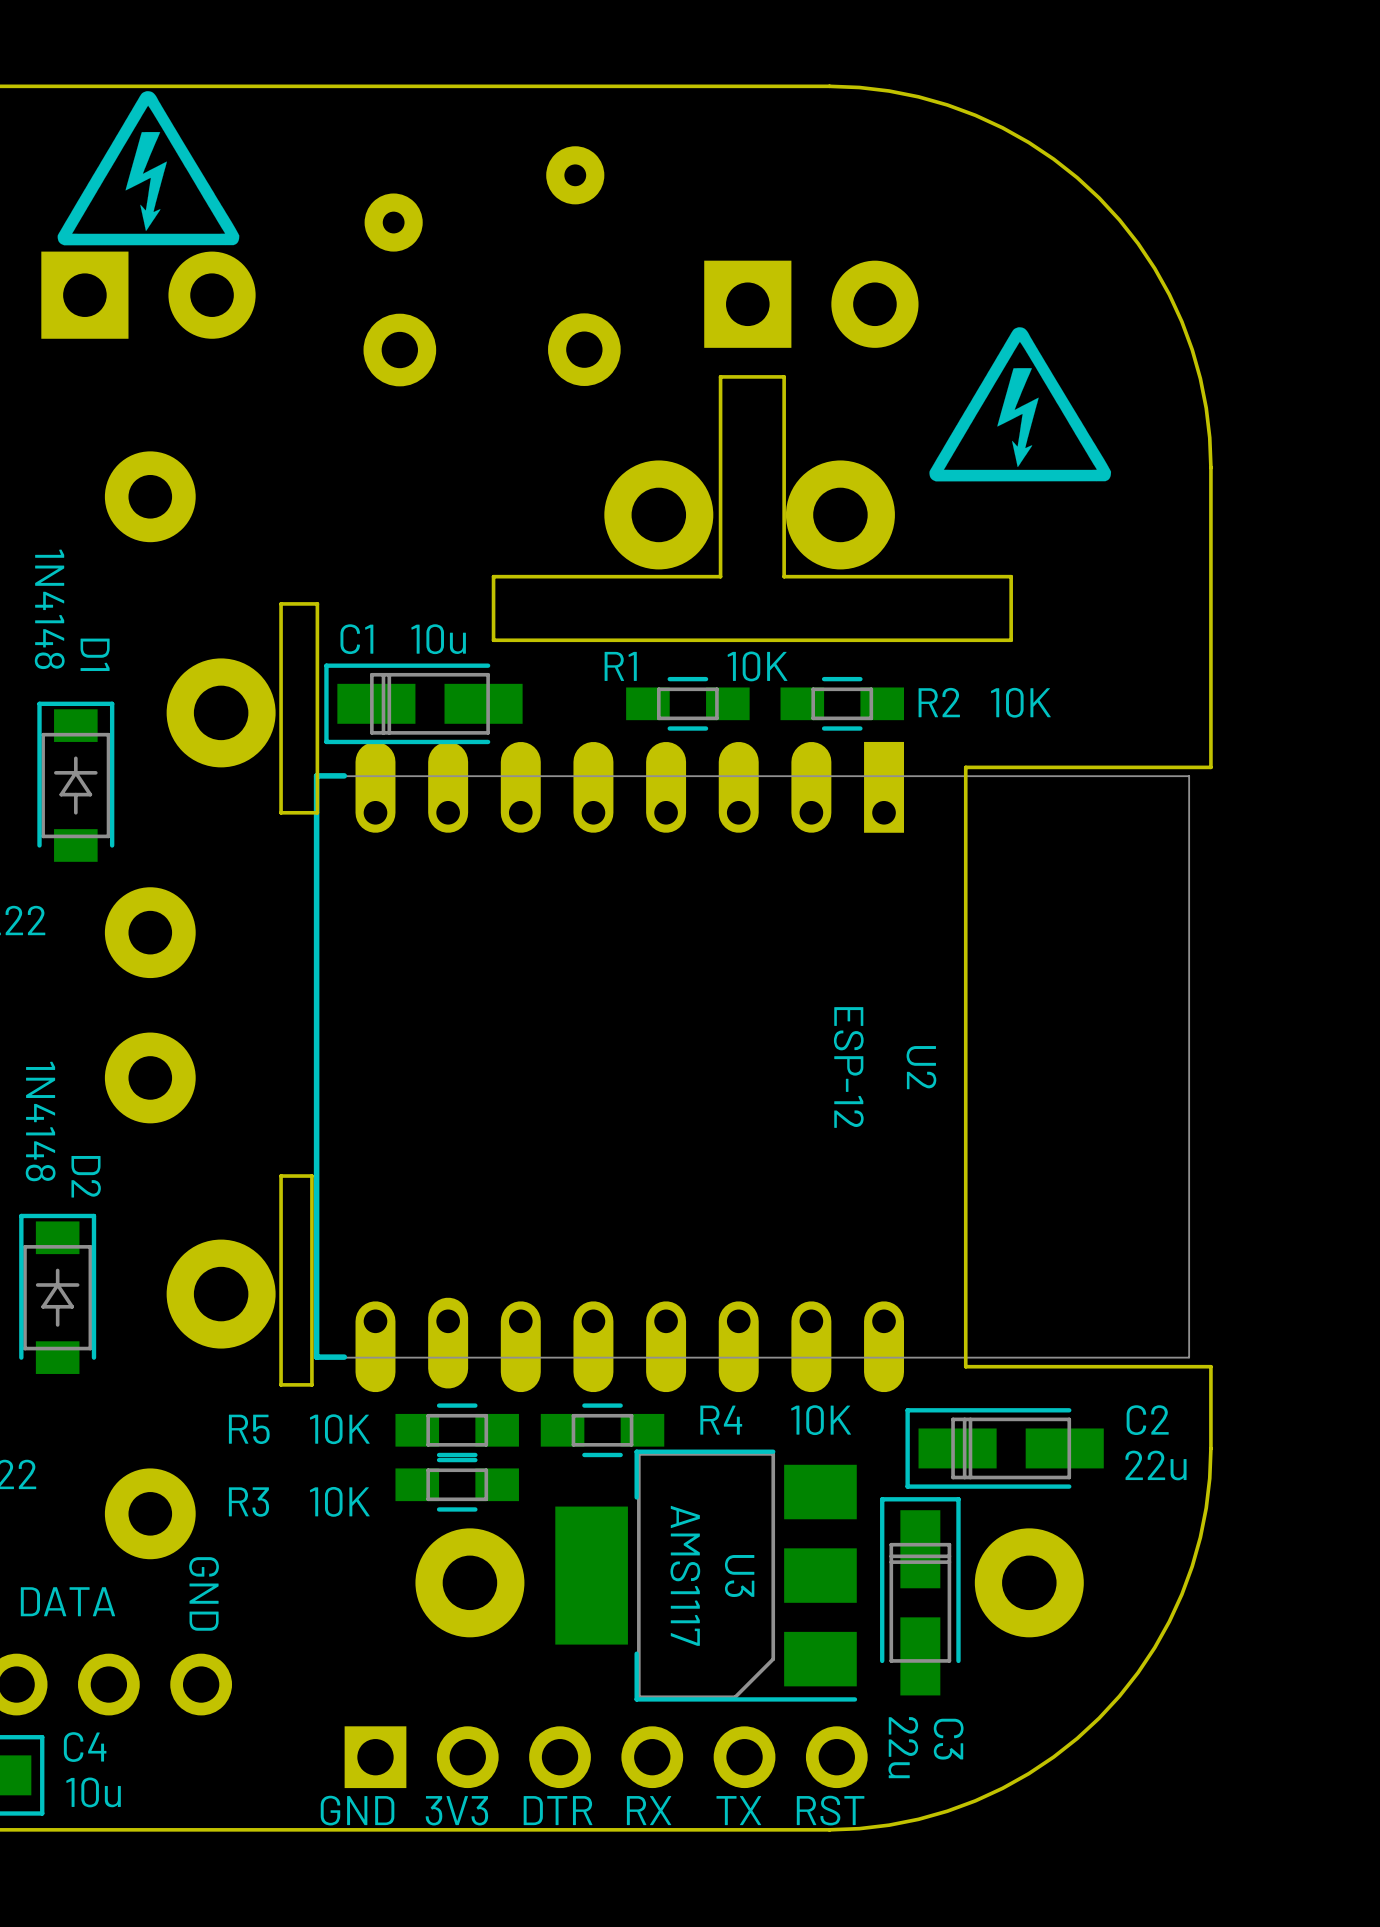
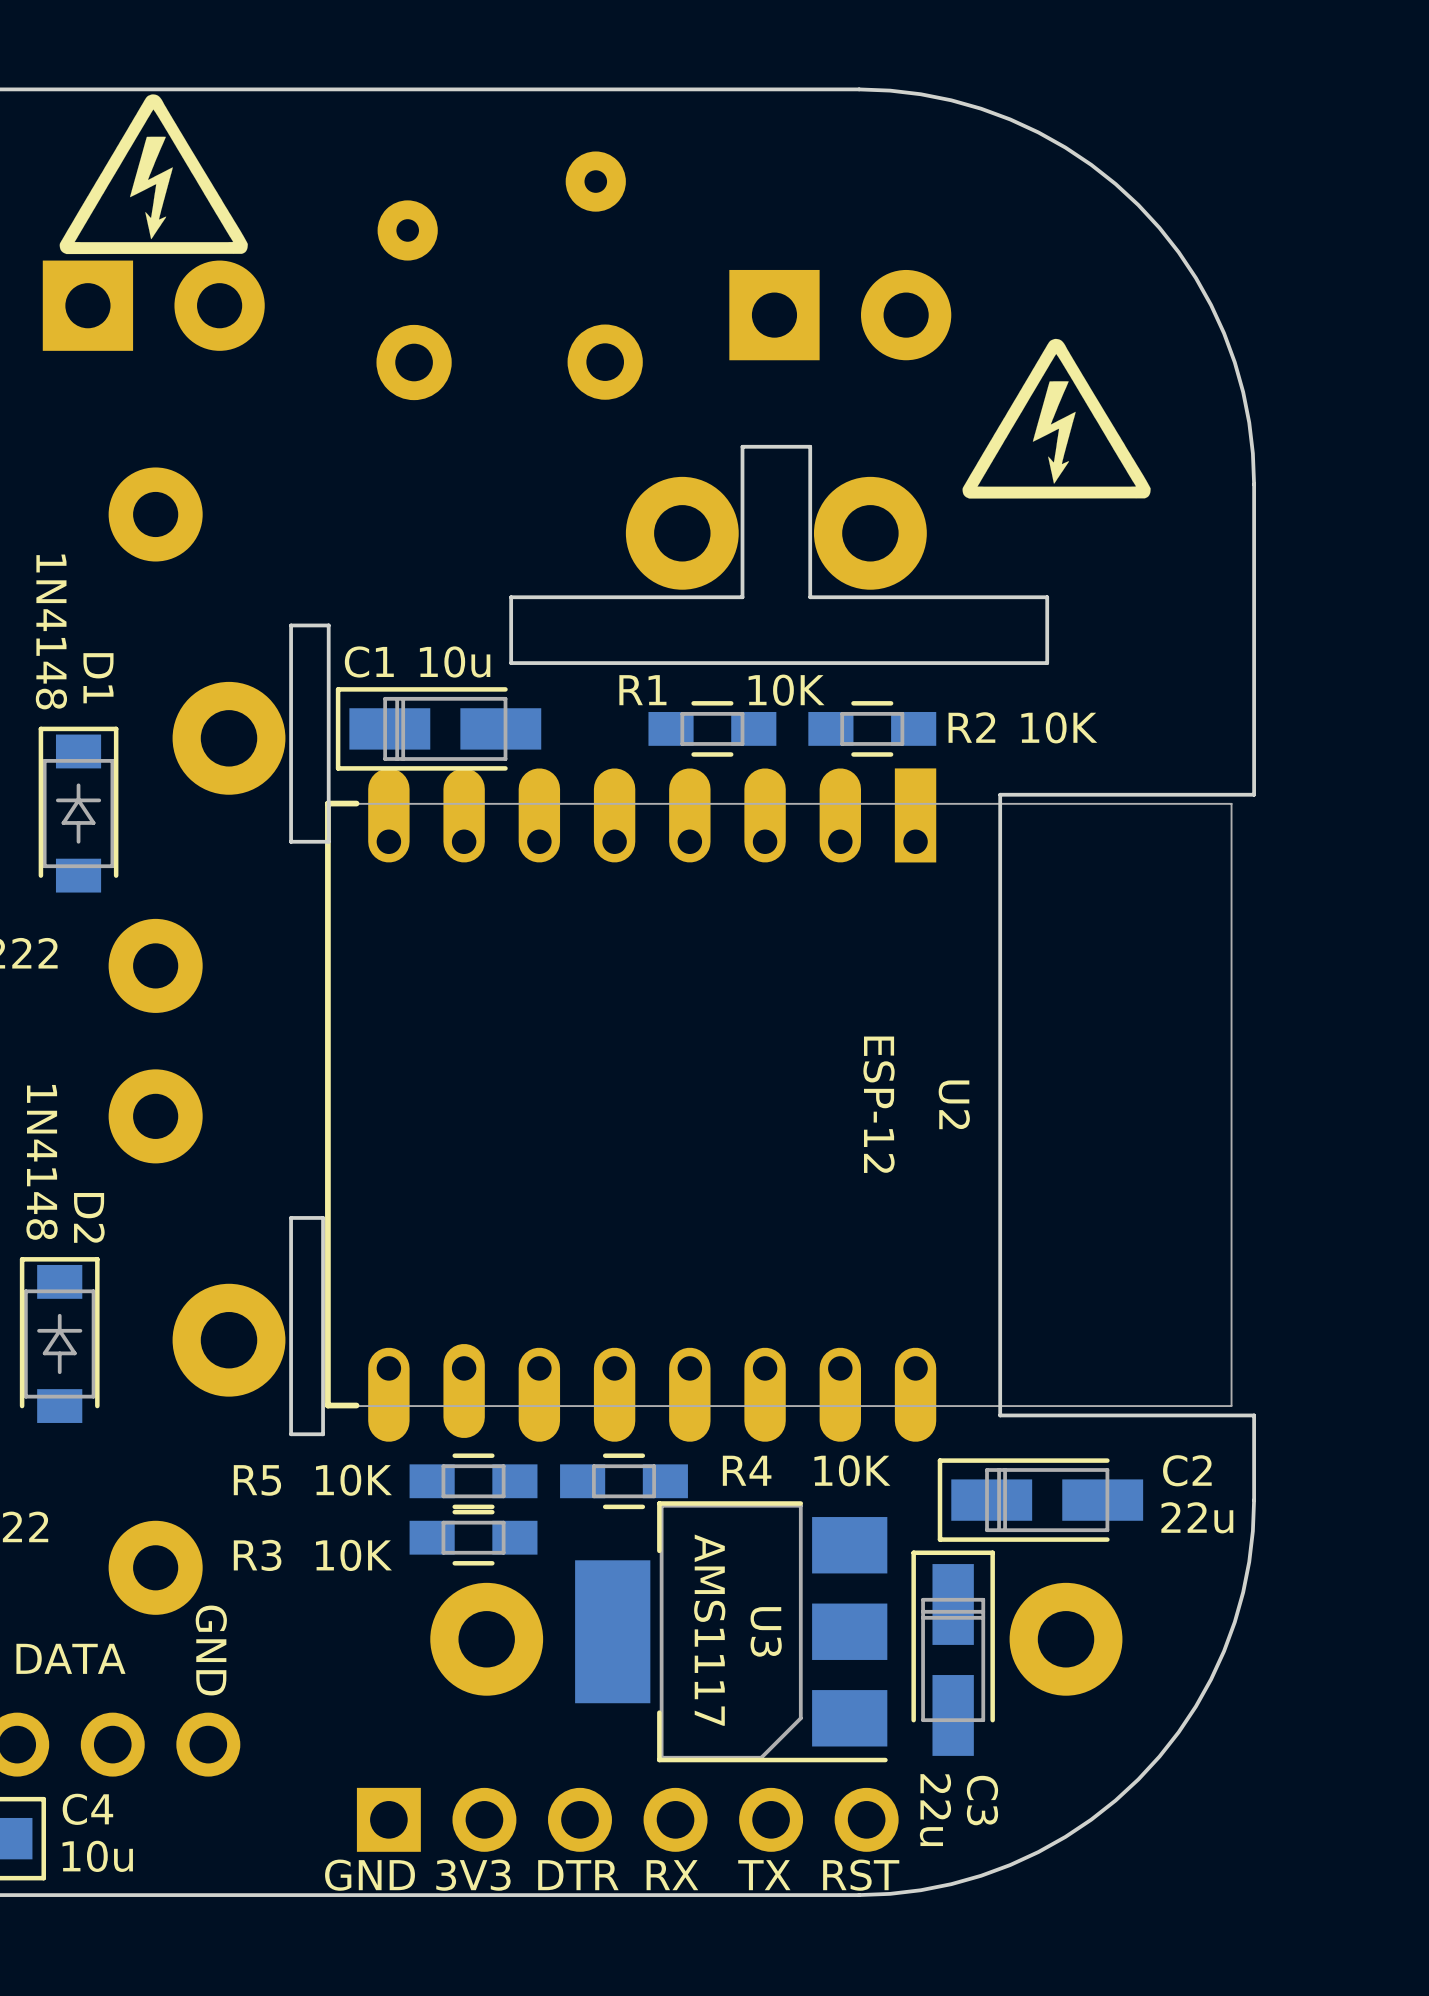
board edge: (784, 576) (784, 376) (720, 376) (720, 576) (716, 576) -> (812, 597) (810, 597) (810, 446) (742, 446) (742, 597)

